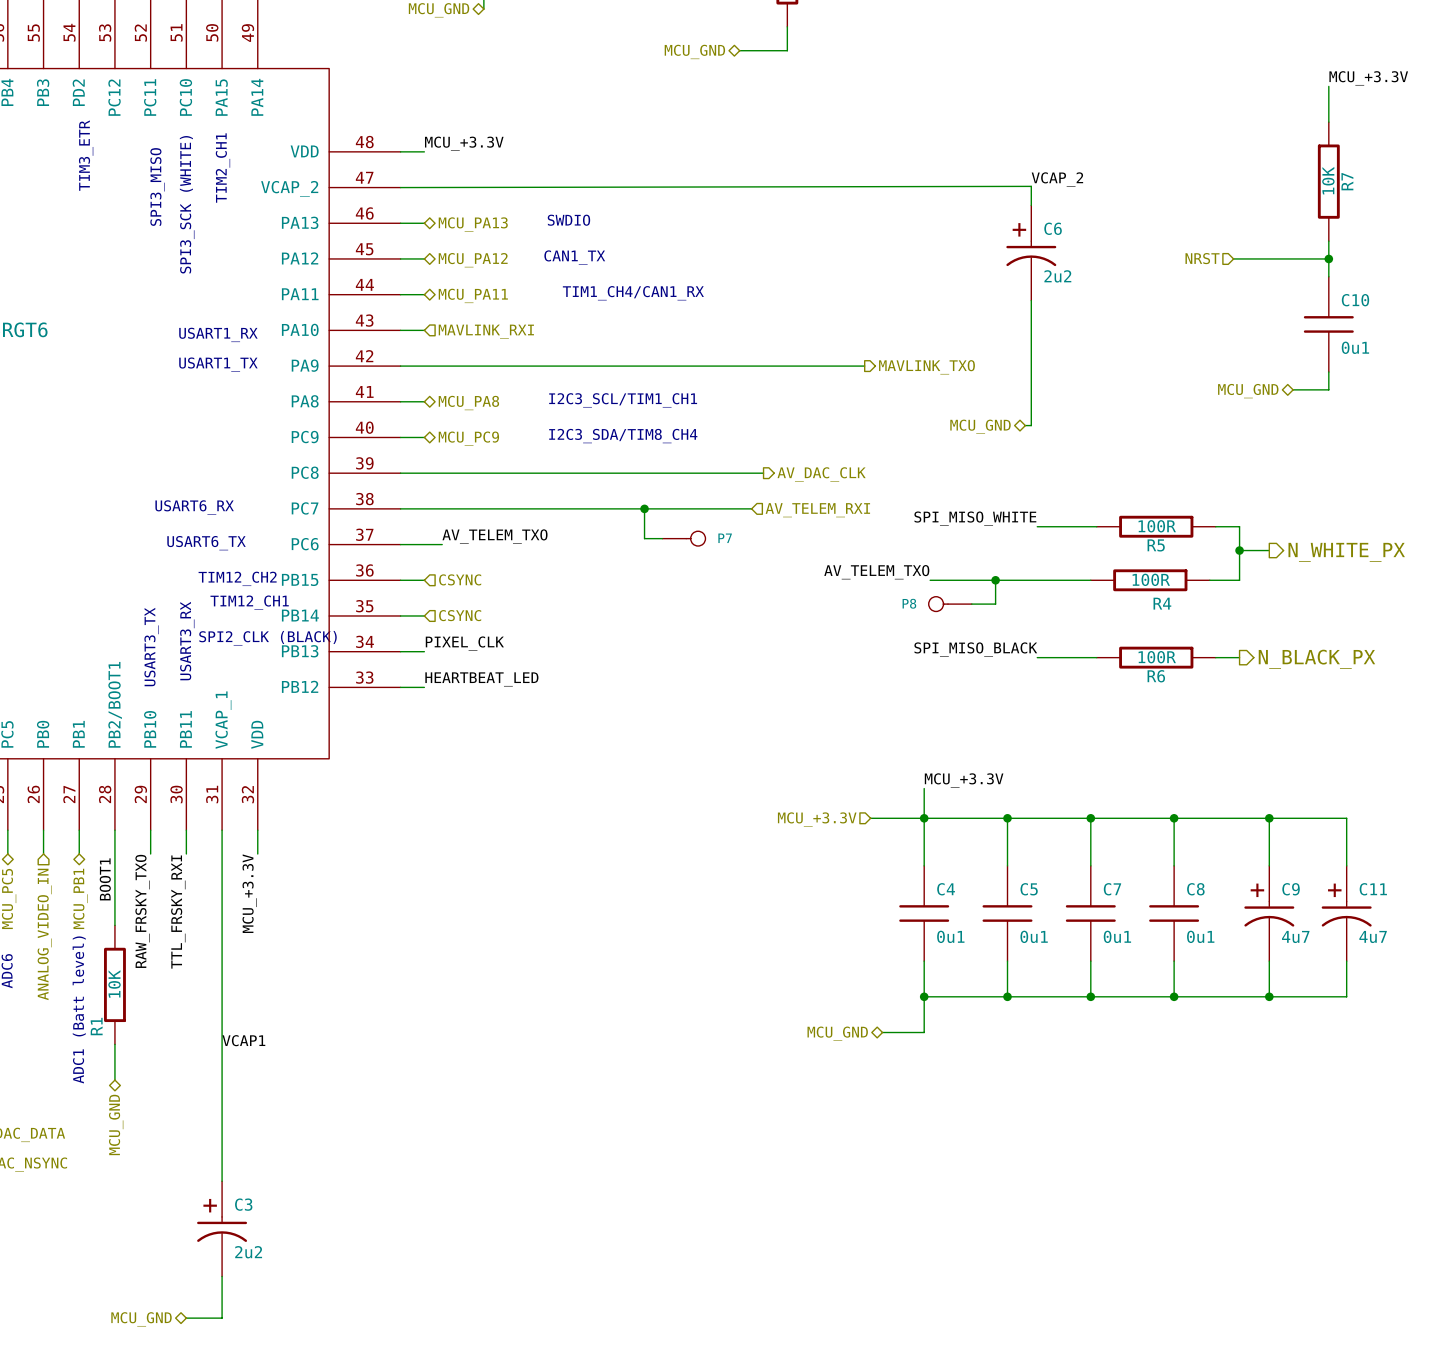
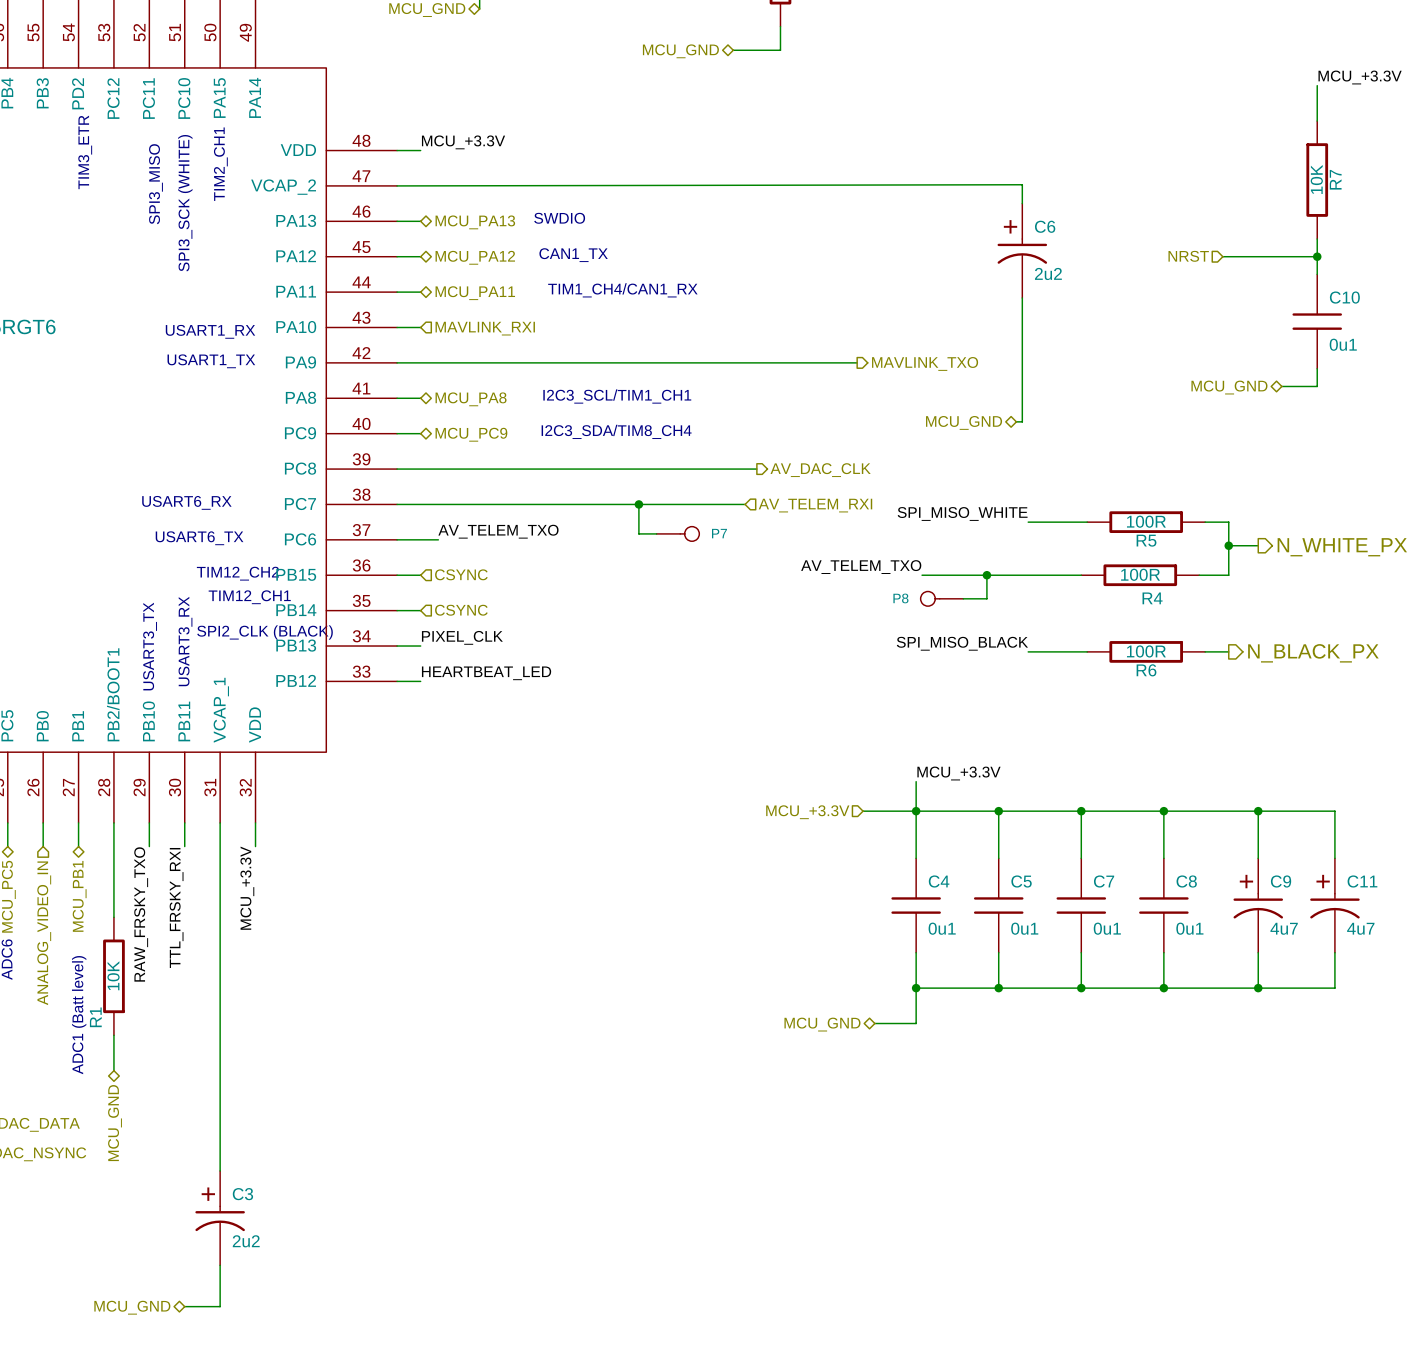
label: VCAP_2 (1057, 179) -> none
label: BOOT1 (105, 879) -> none
label: VCAP1 (243, 1040) -> none

